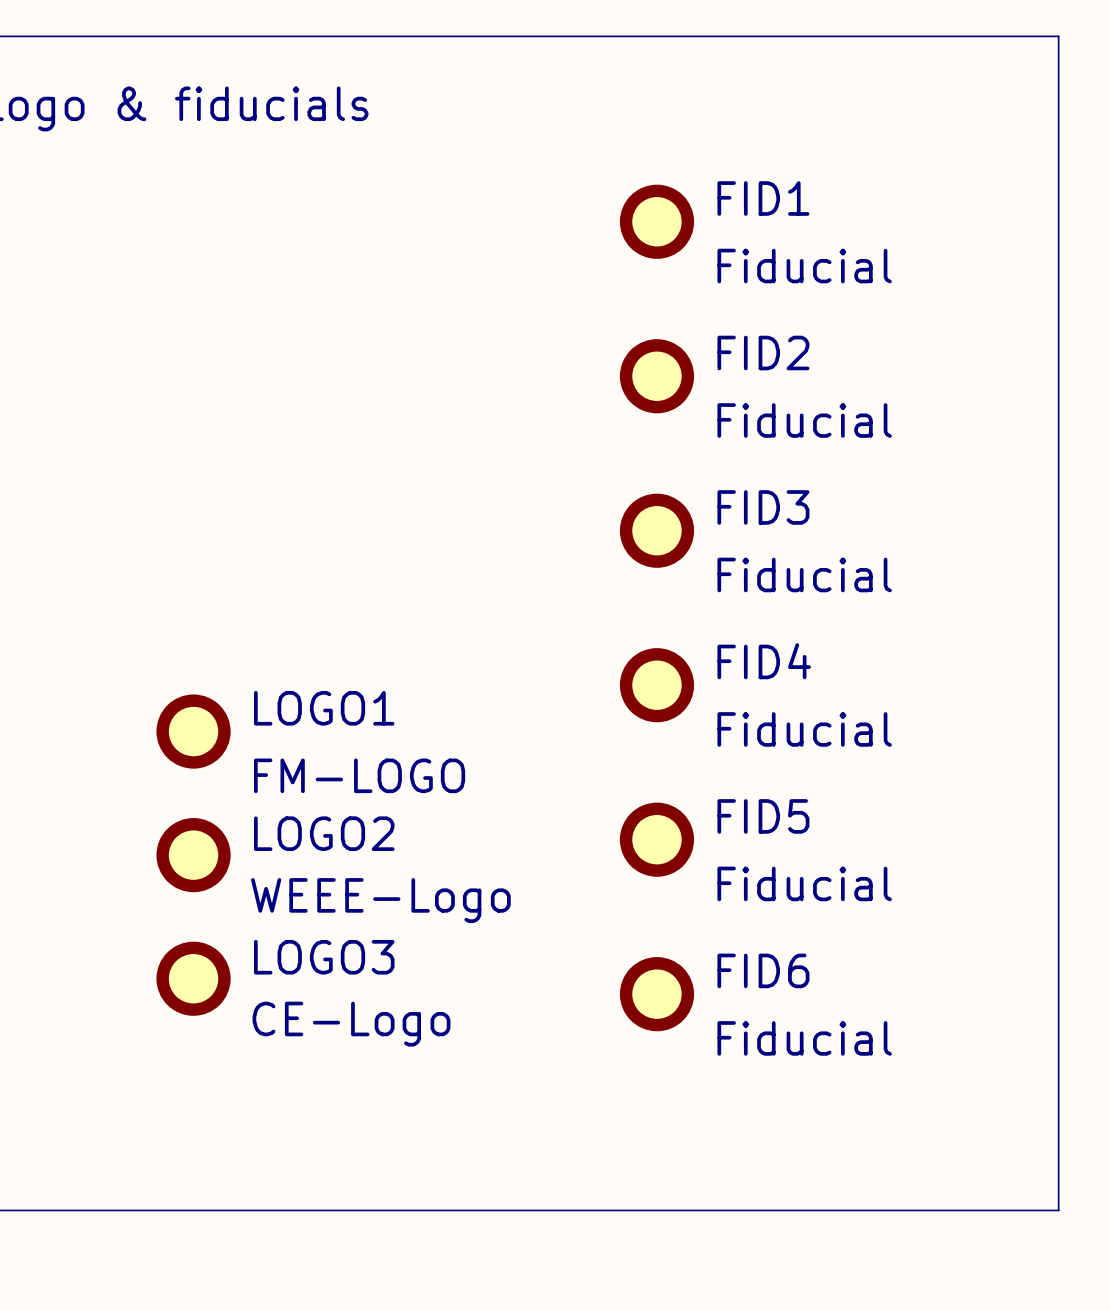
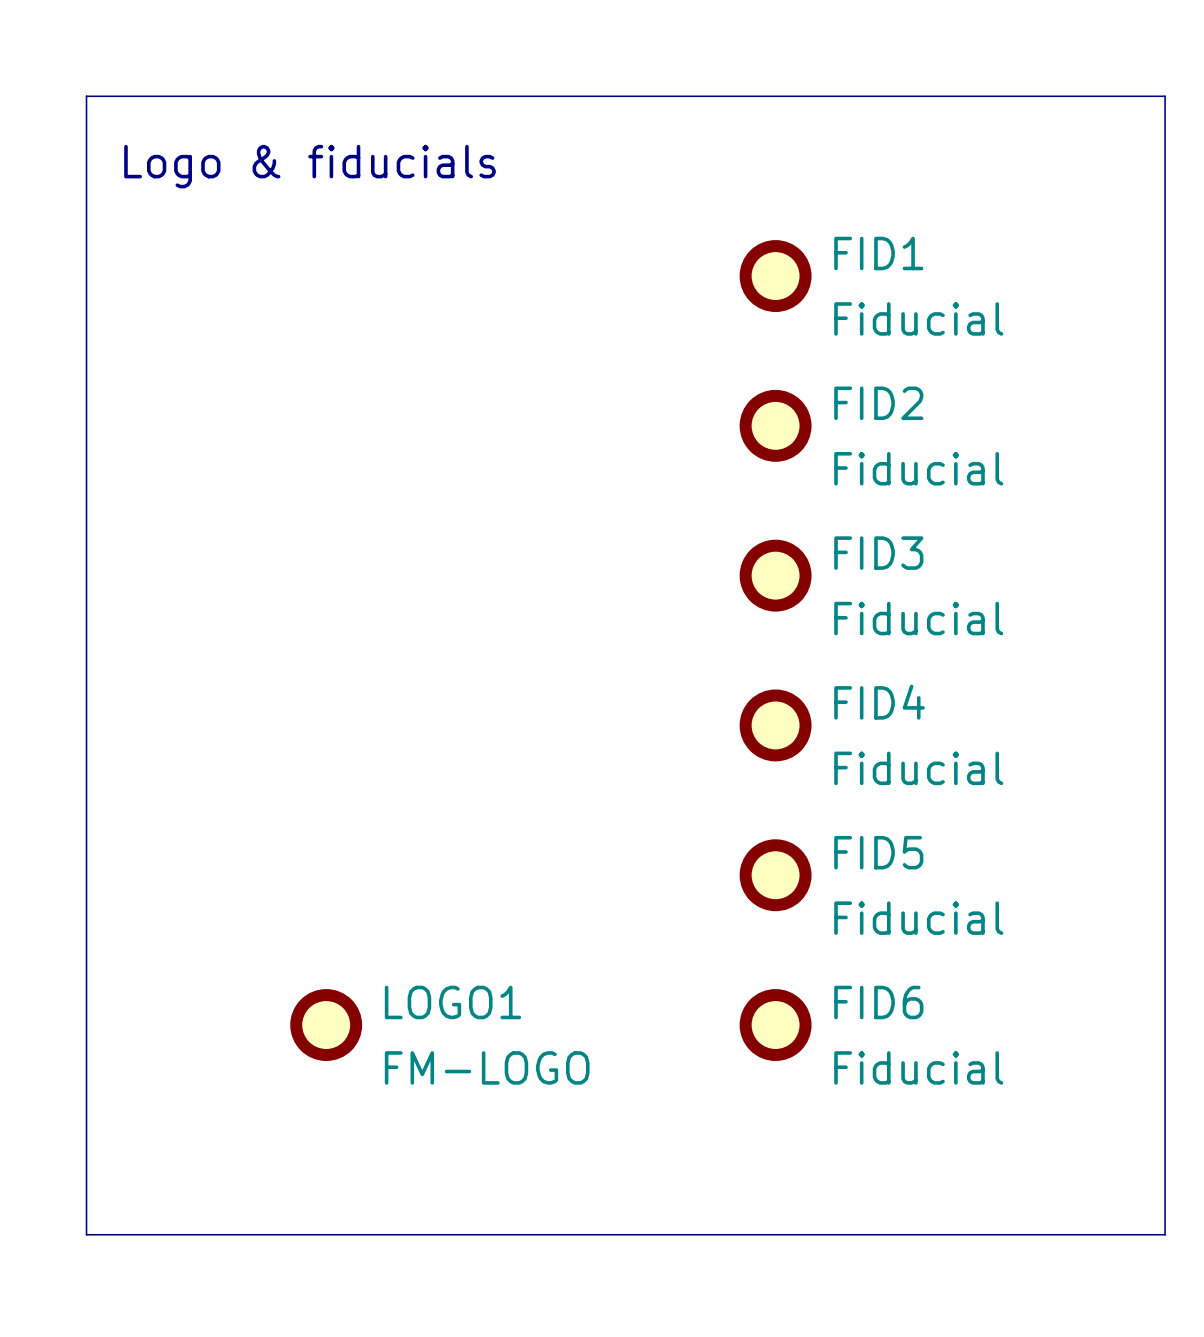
LOGO1 position: (193, 731) -> (326, 1025)
LOGO2: WEEE-Logo (193, 855) -> none
LOGO3: CE-Logo (193, 978) -> none

